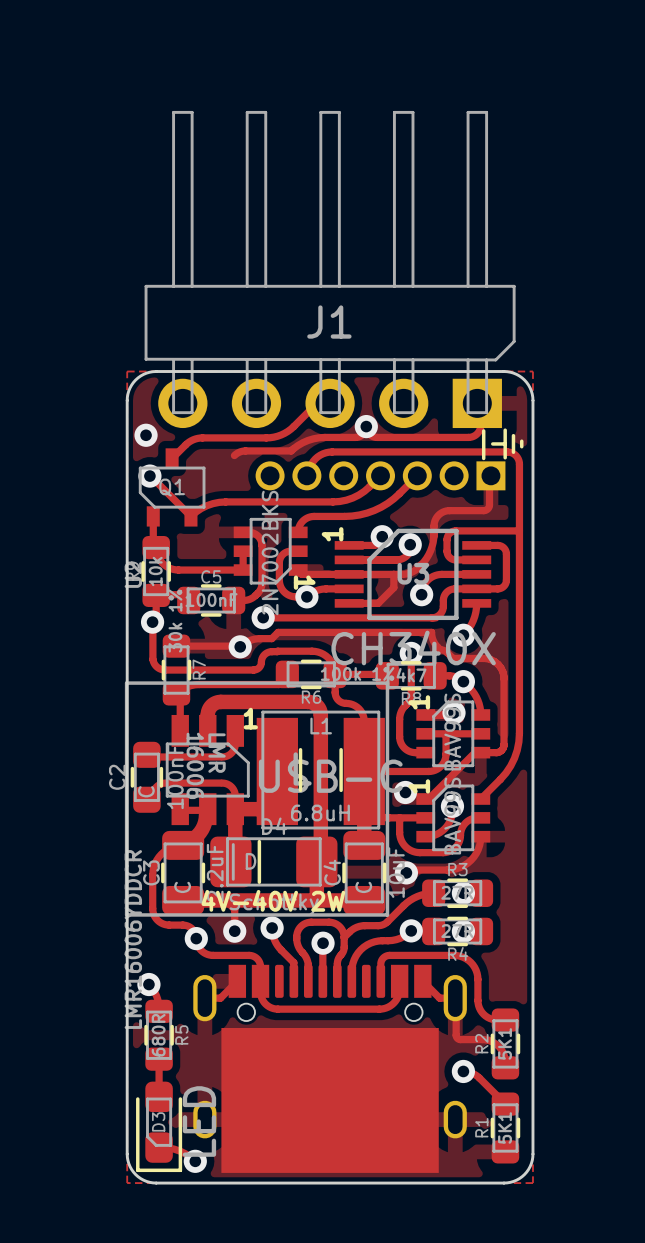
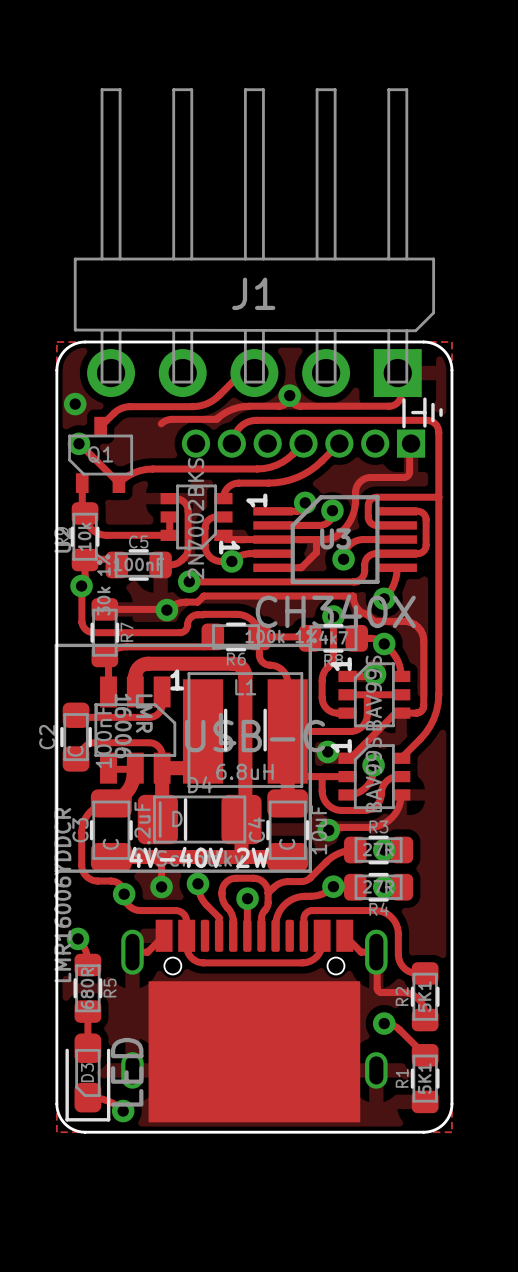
U3 footprint: [334, 528, 492, 621] -> [253, 495, 417, 585]

